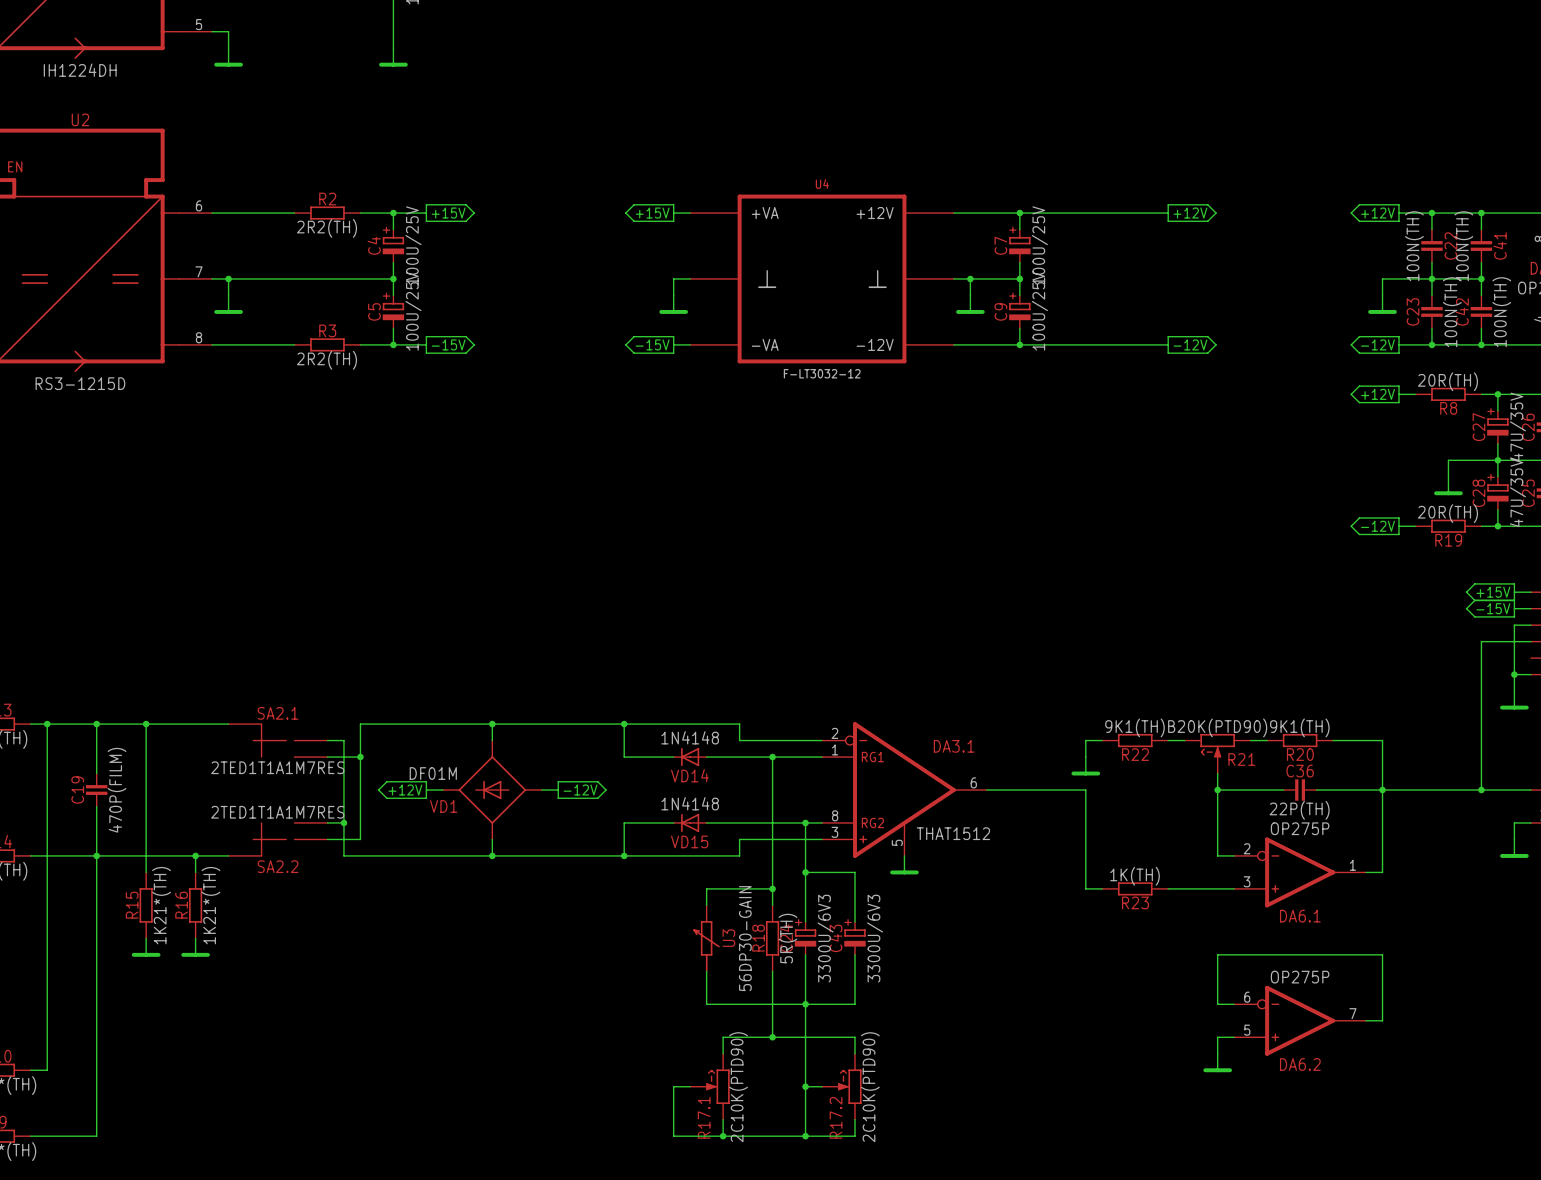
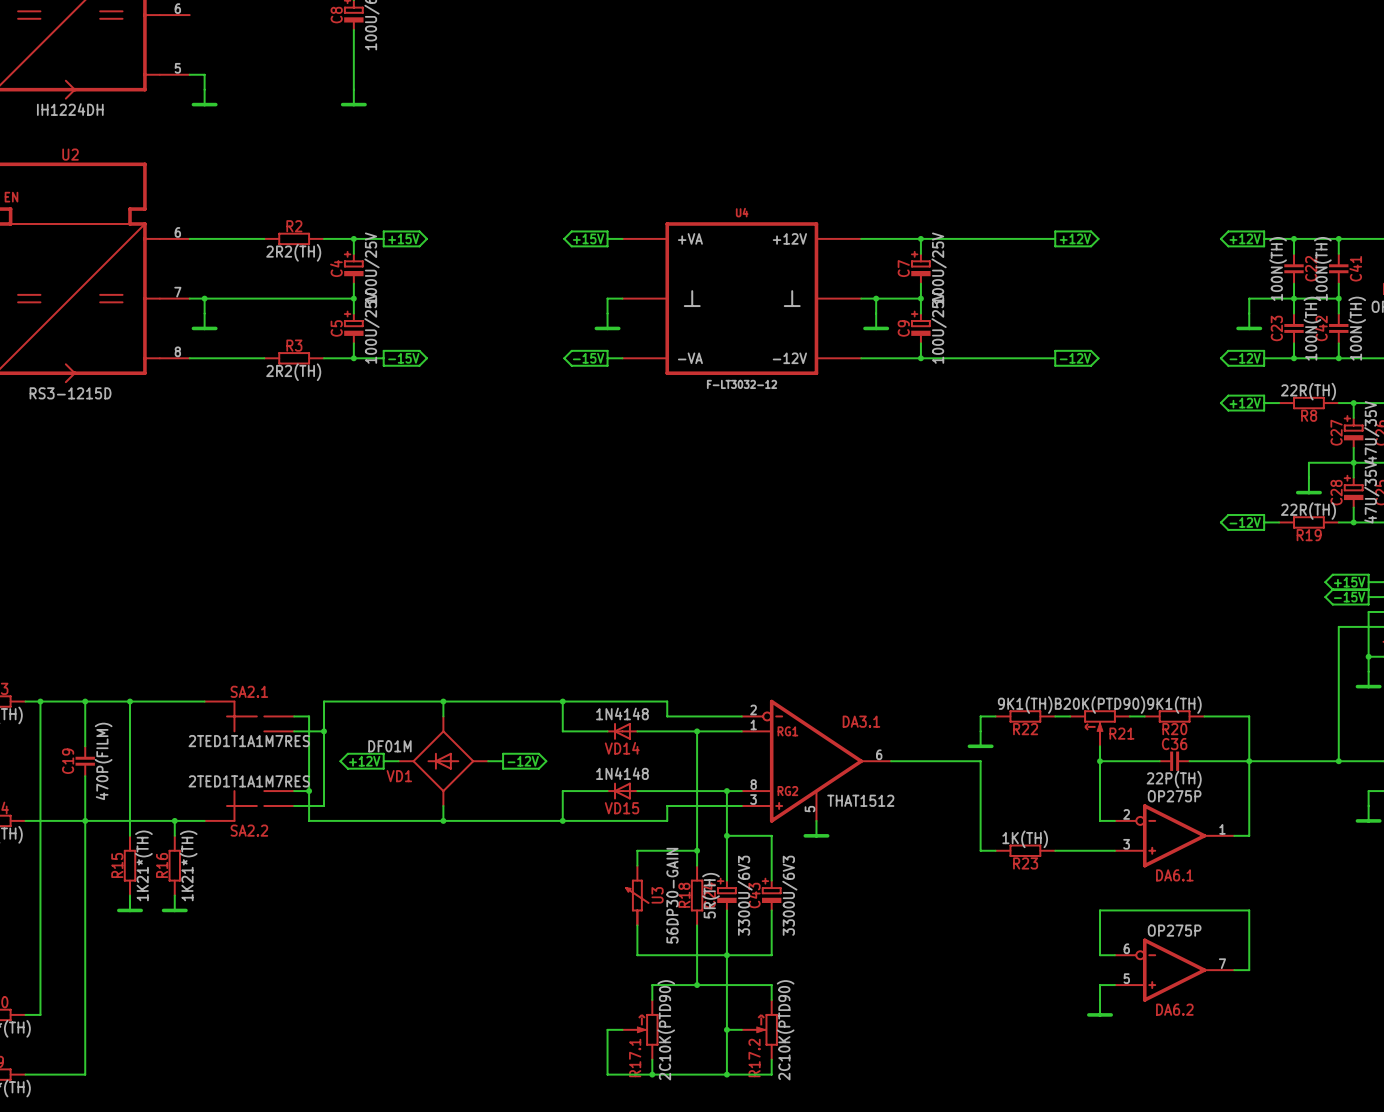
R8 value: 20R(TH) (1447, 381) -> 22R(TH) (1308, 391)
R19 value: 20R(TH) (1447, 513) -> 22R(TH) (1308, 511)

